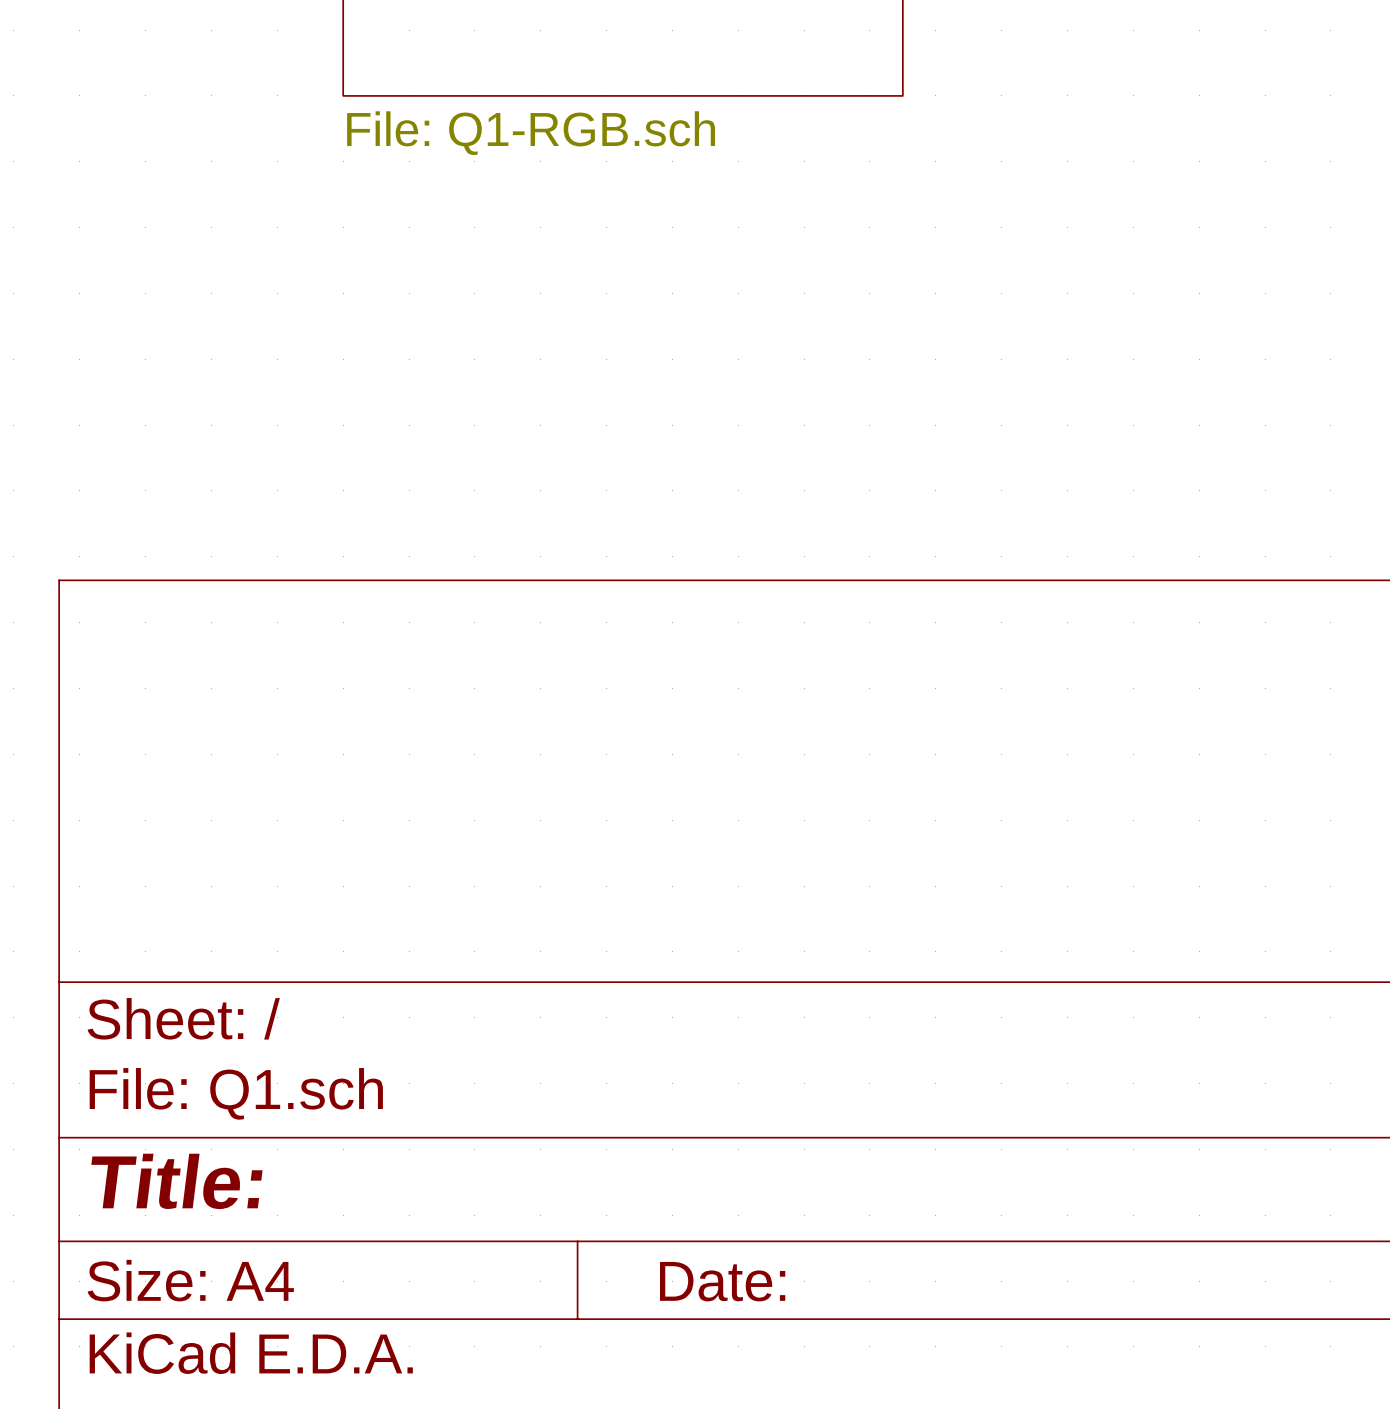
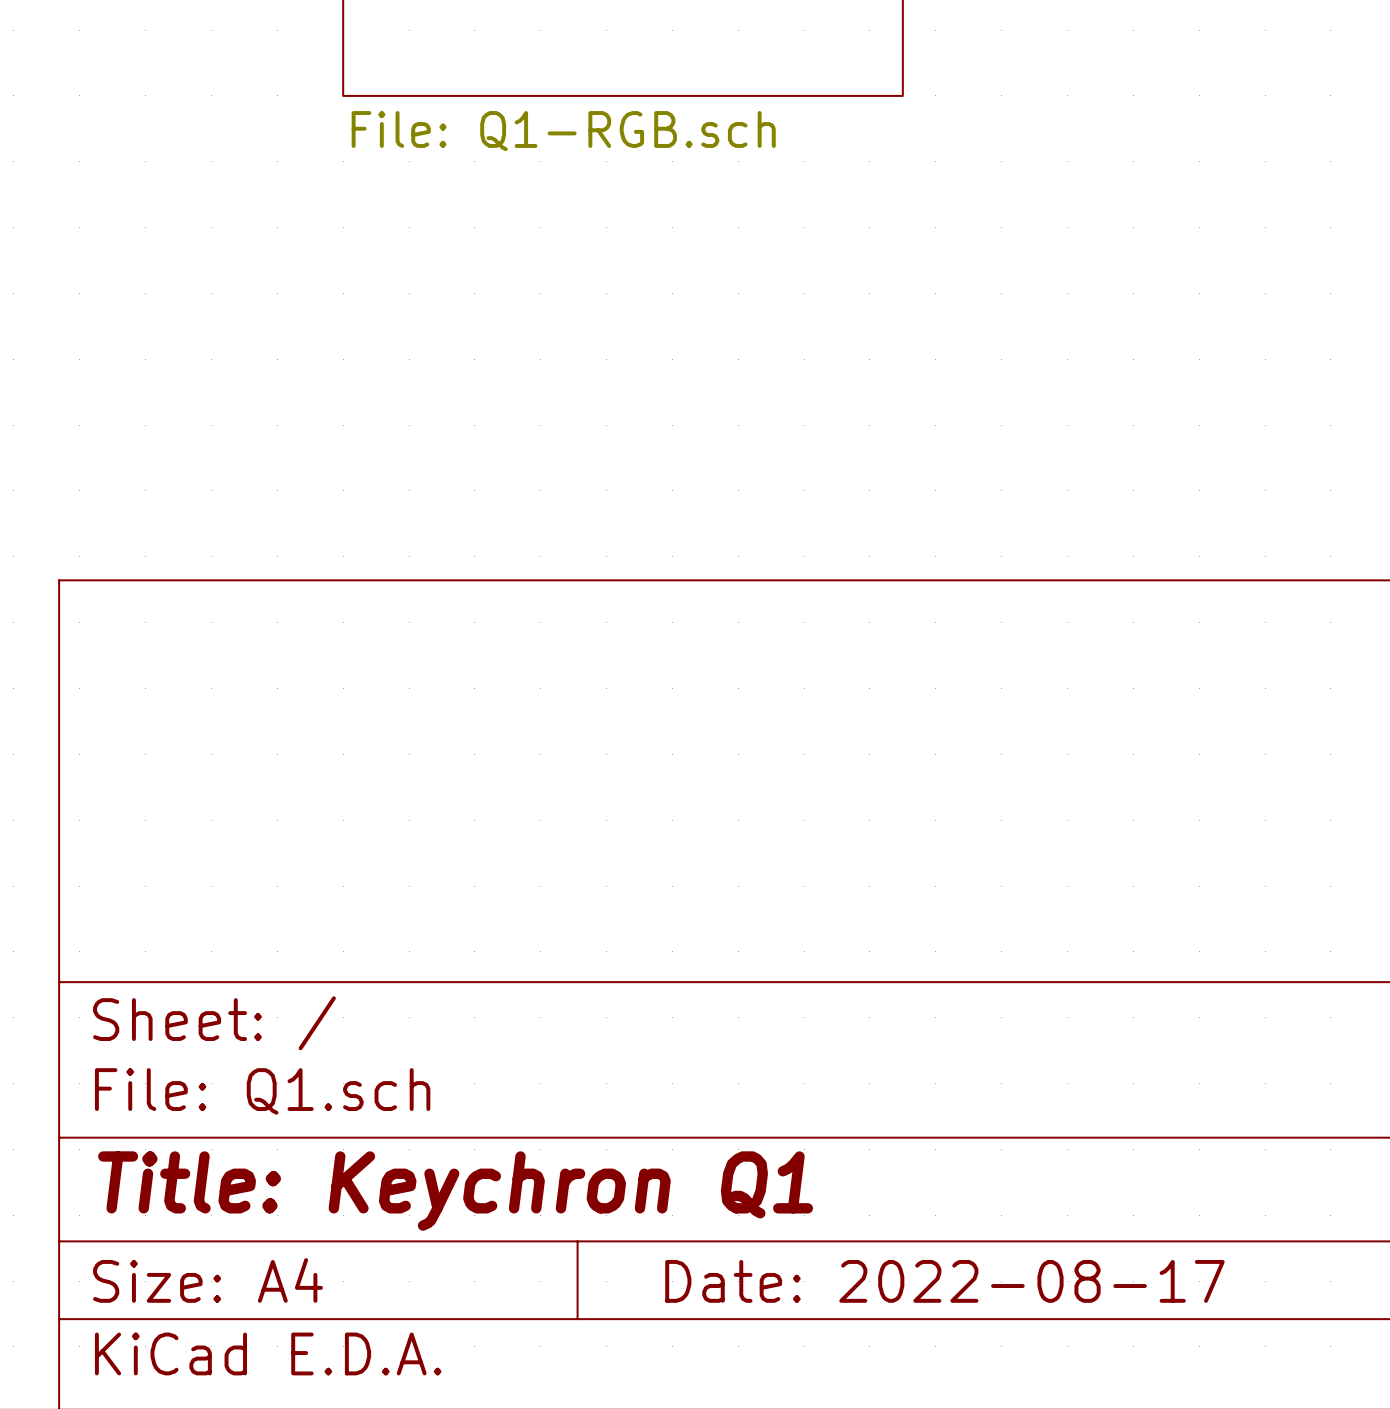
title block: Title: (176, 1181) -> Title: Keychron Q1 (455, 1191)
title block: Date: (722, 1281) -> Date: 2022-08-17 (944, 1281)

